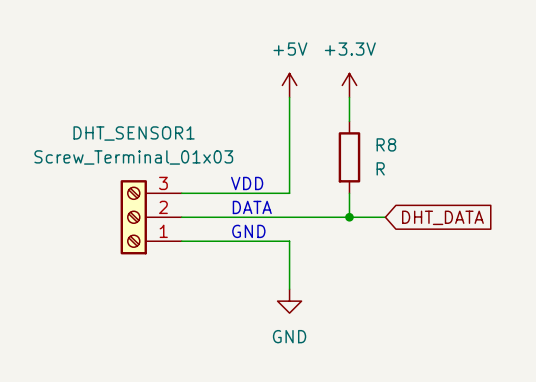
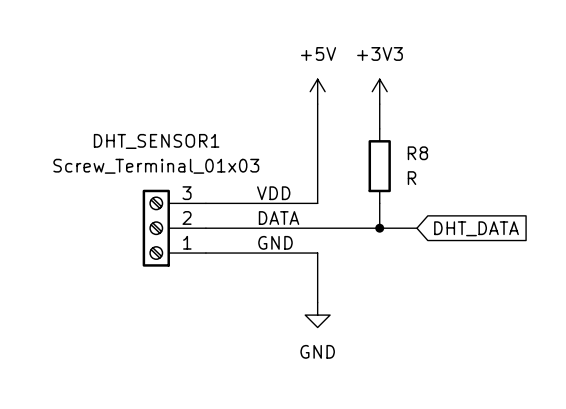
power symbol: +3.3V (349, 85) -> +3V3 (379, 91)

